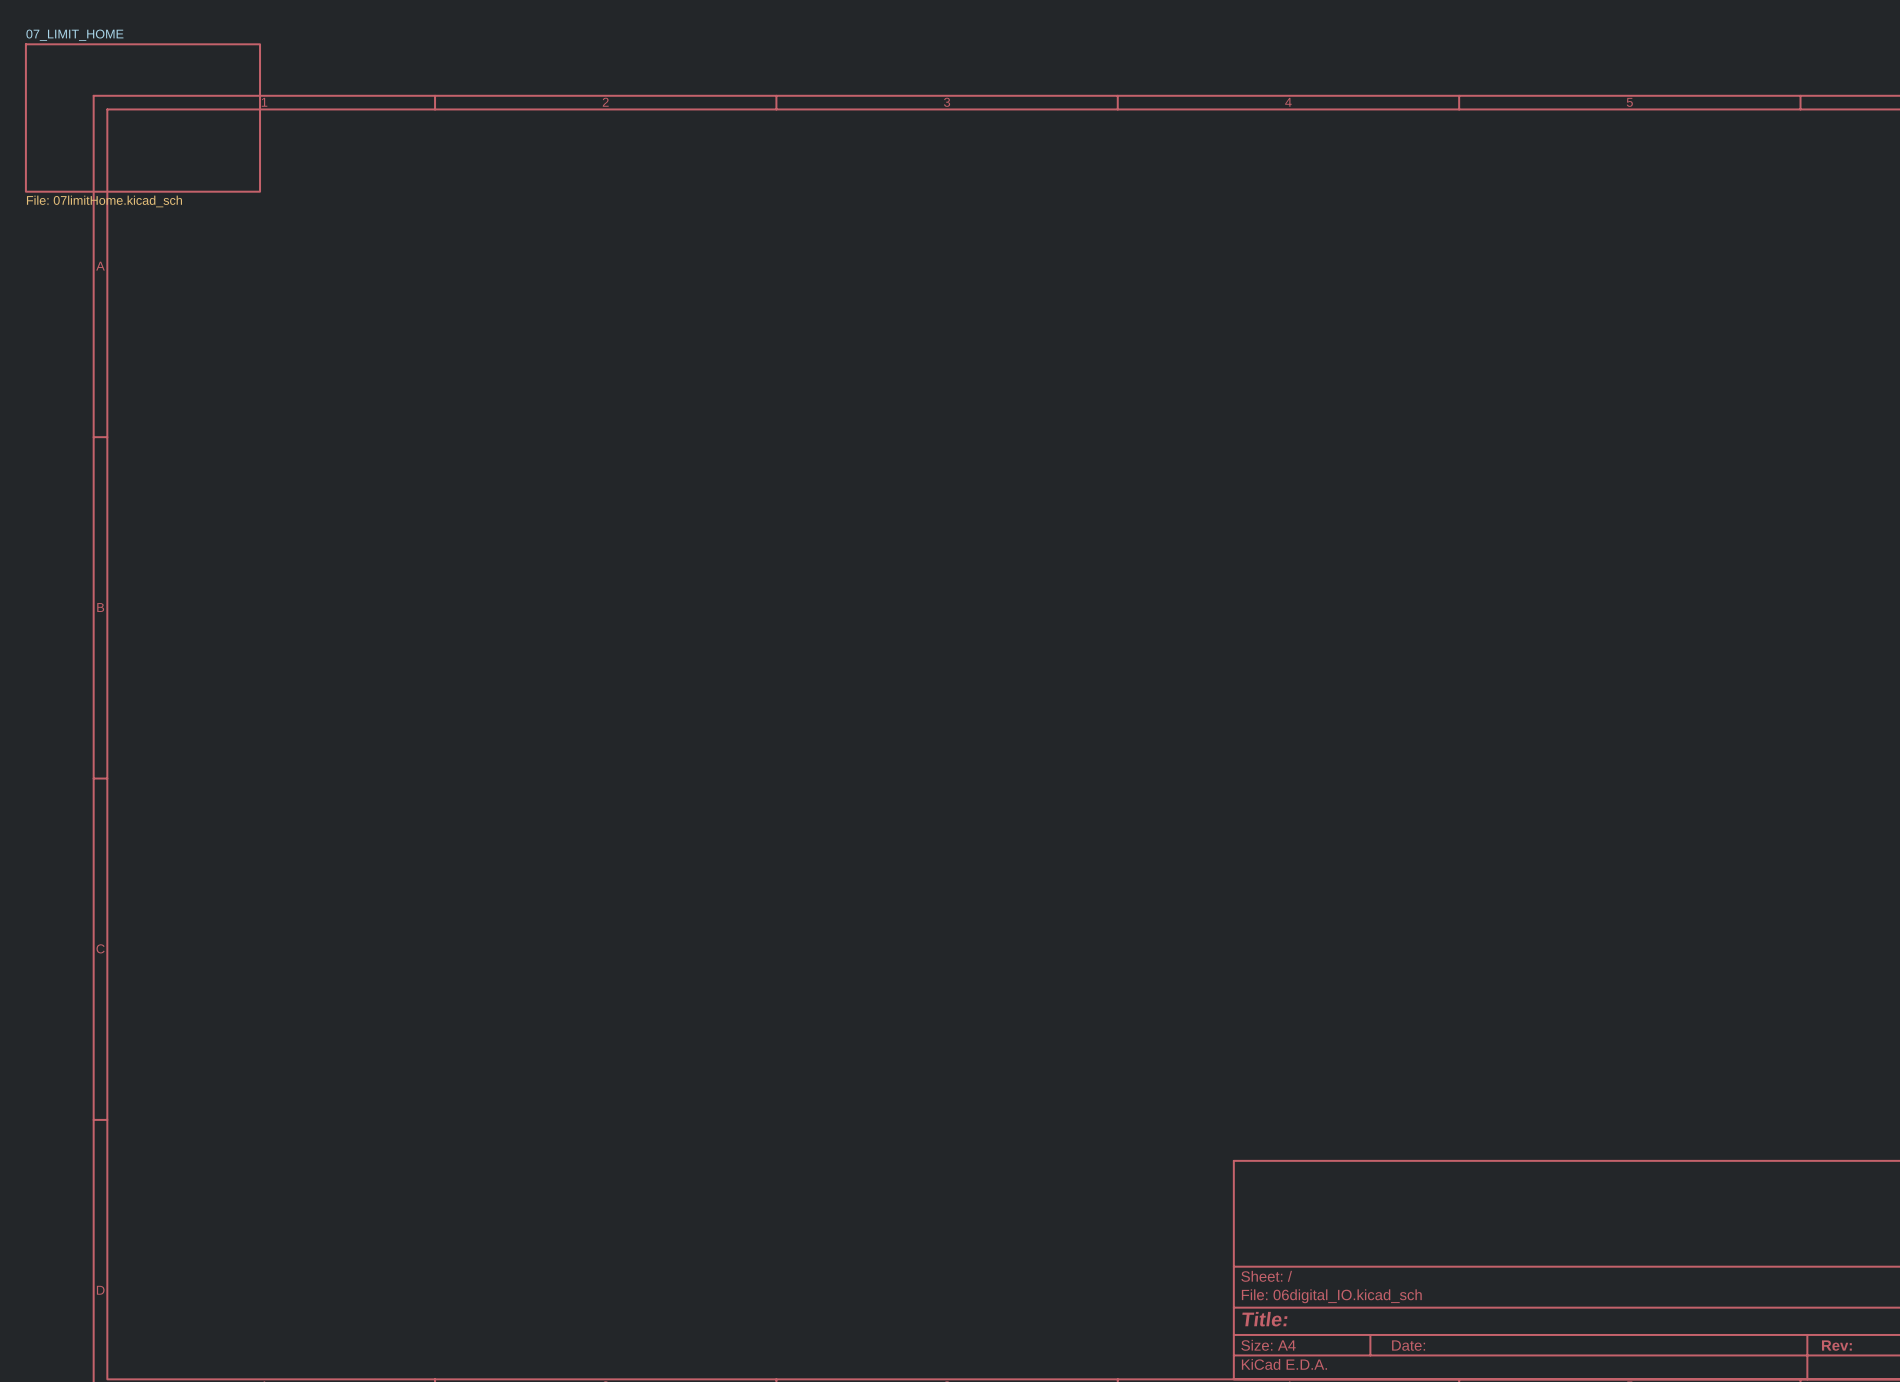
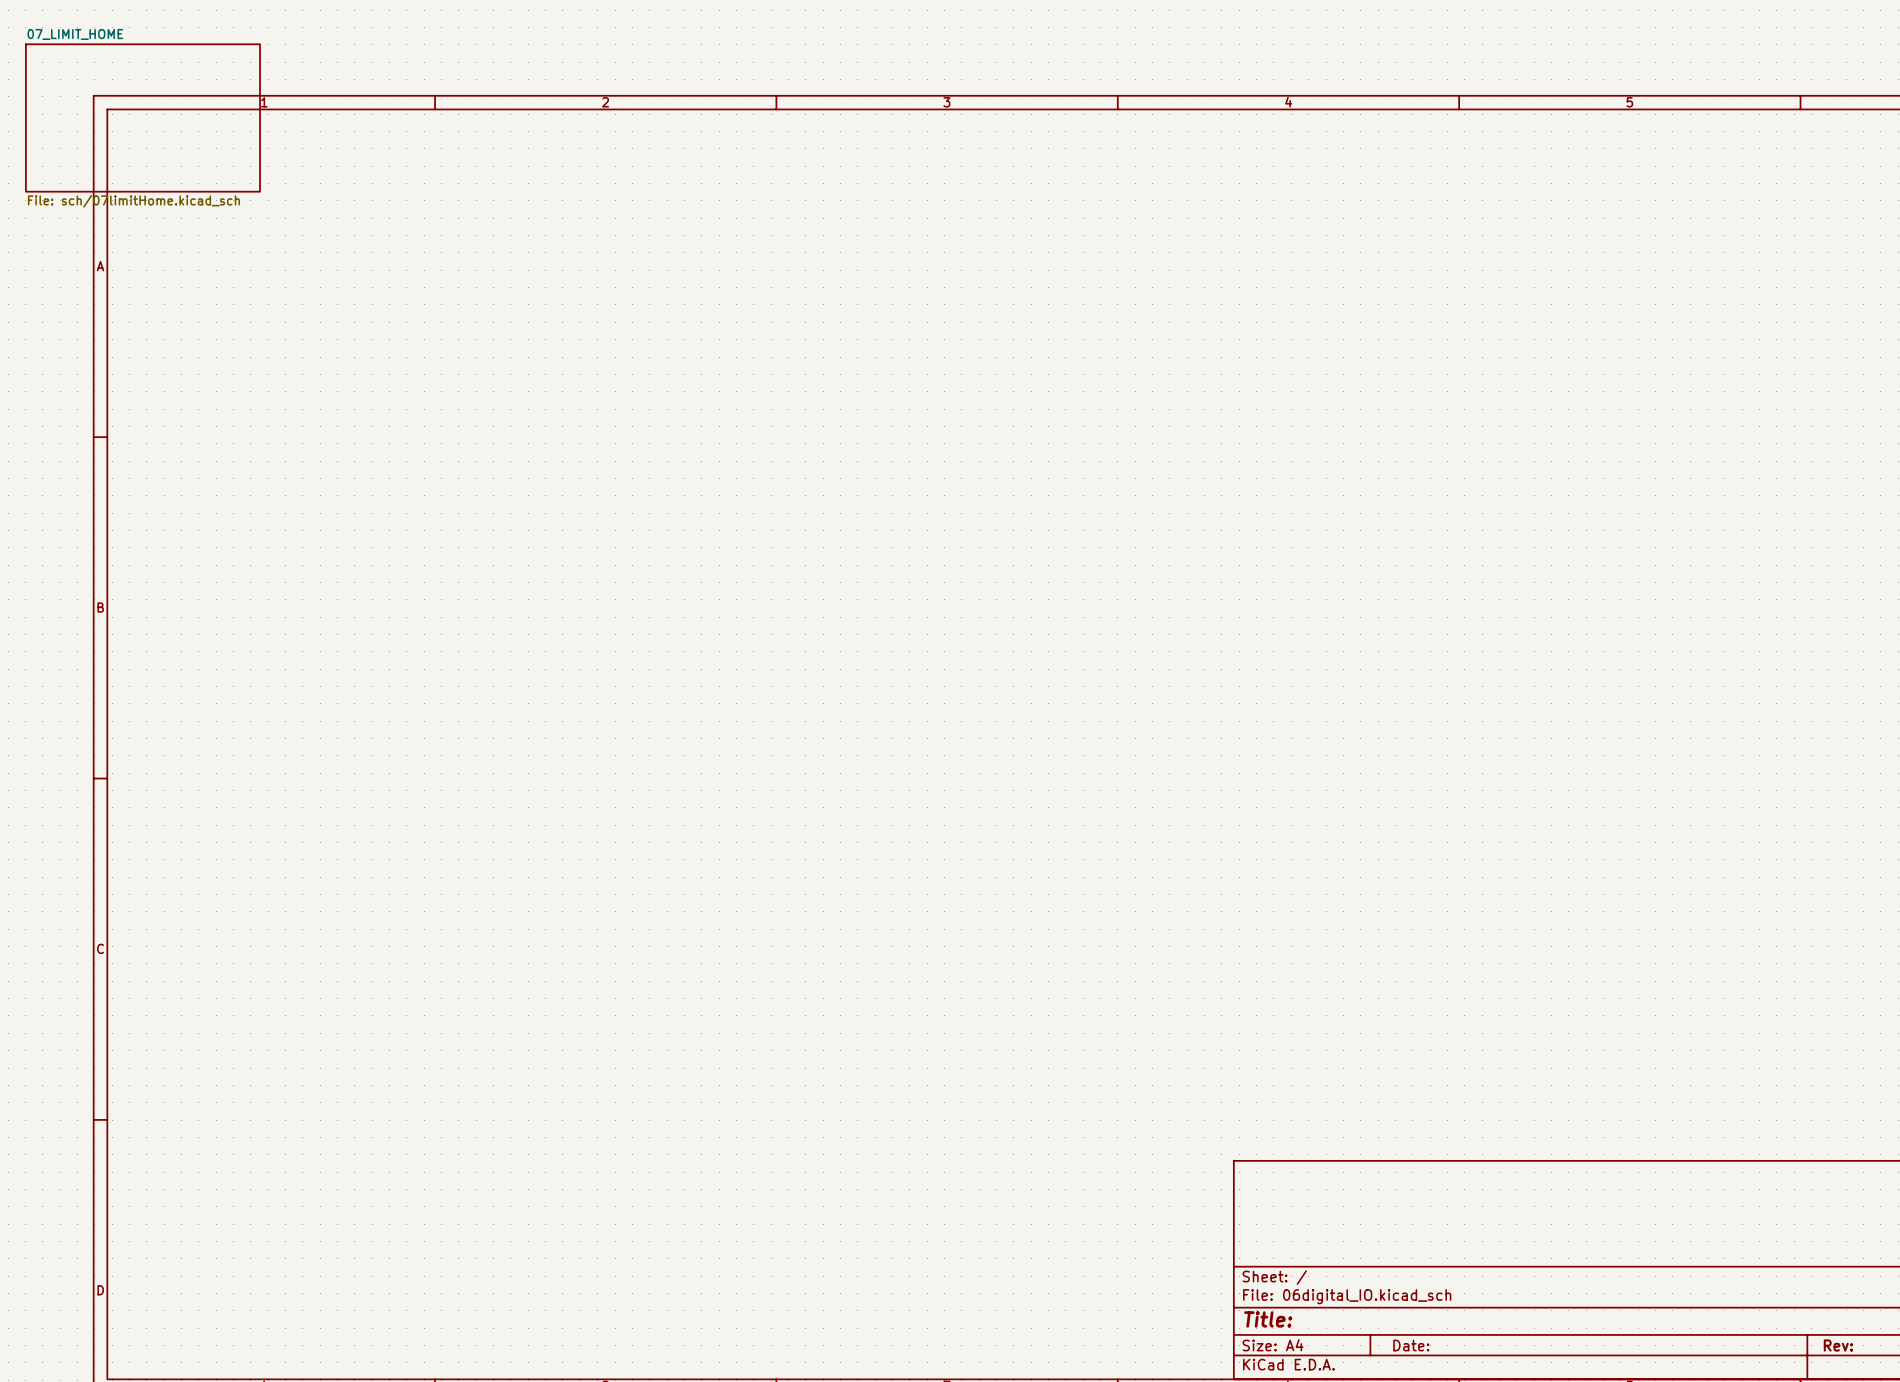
sheet 07_LIMIT_HOME value: File: 07limitHome.kicad_sch (104, 201) -> File: sch/07limitHome.kicad_sch (133, 201)

